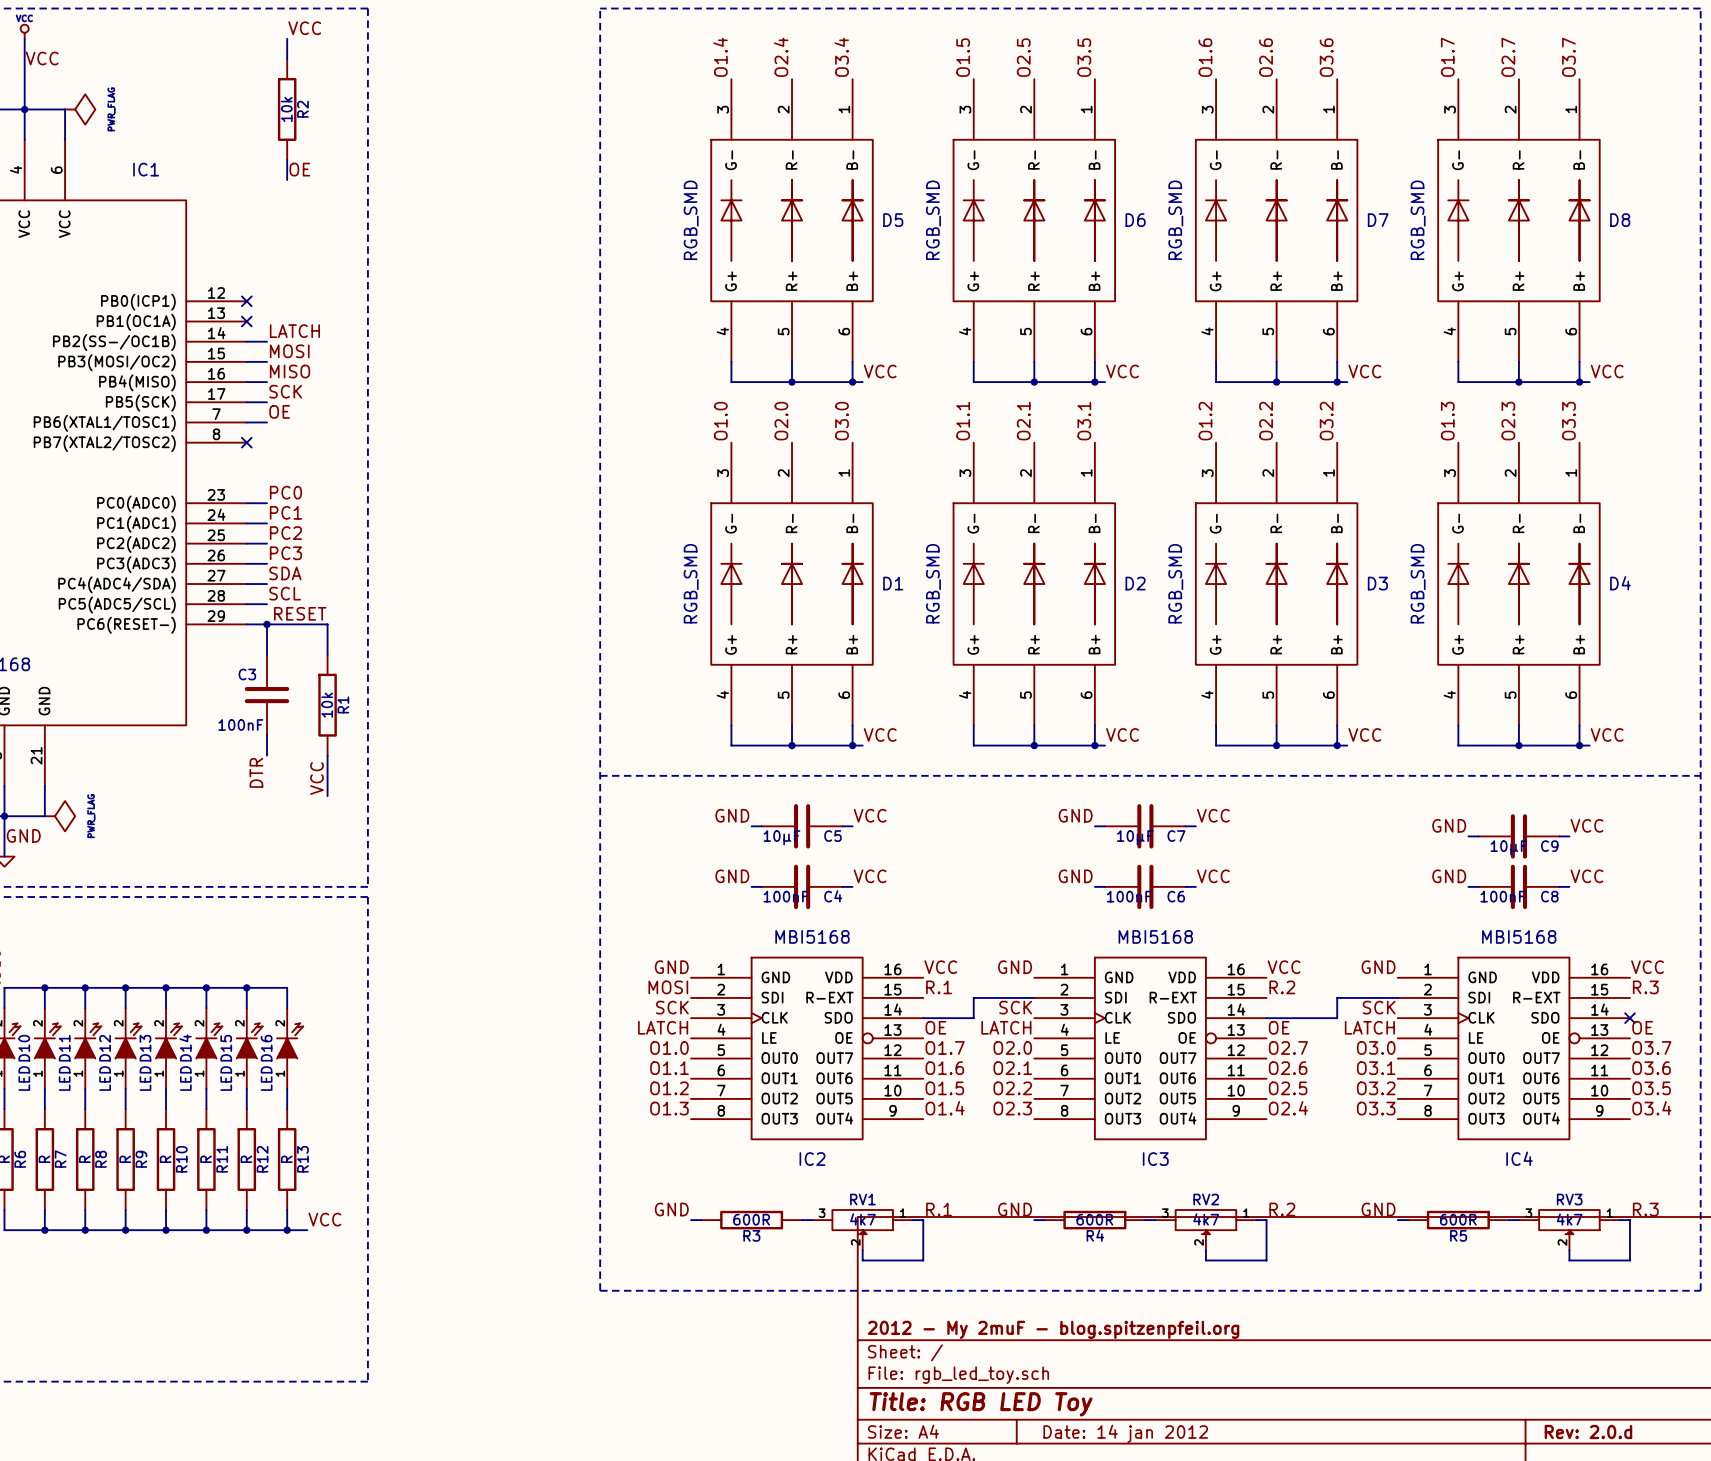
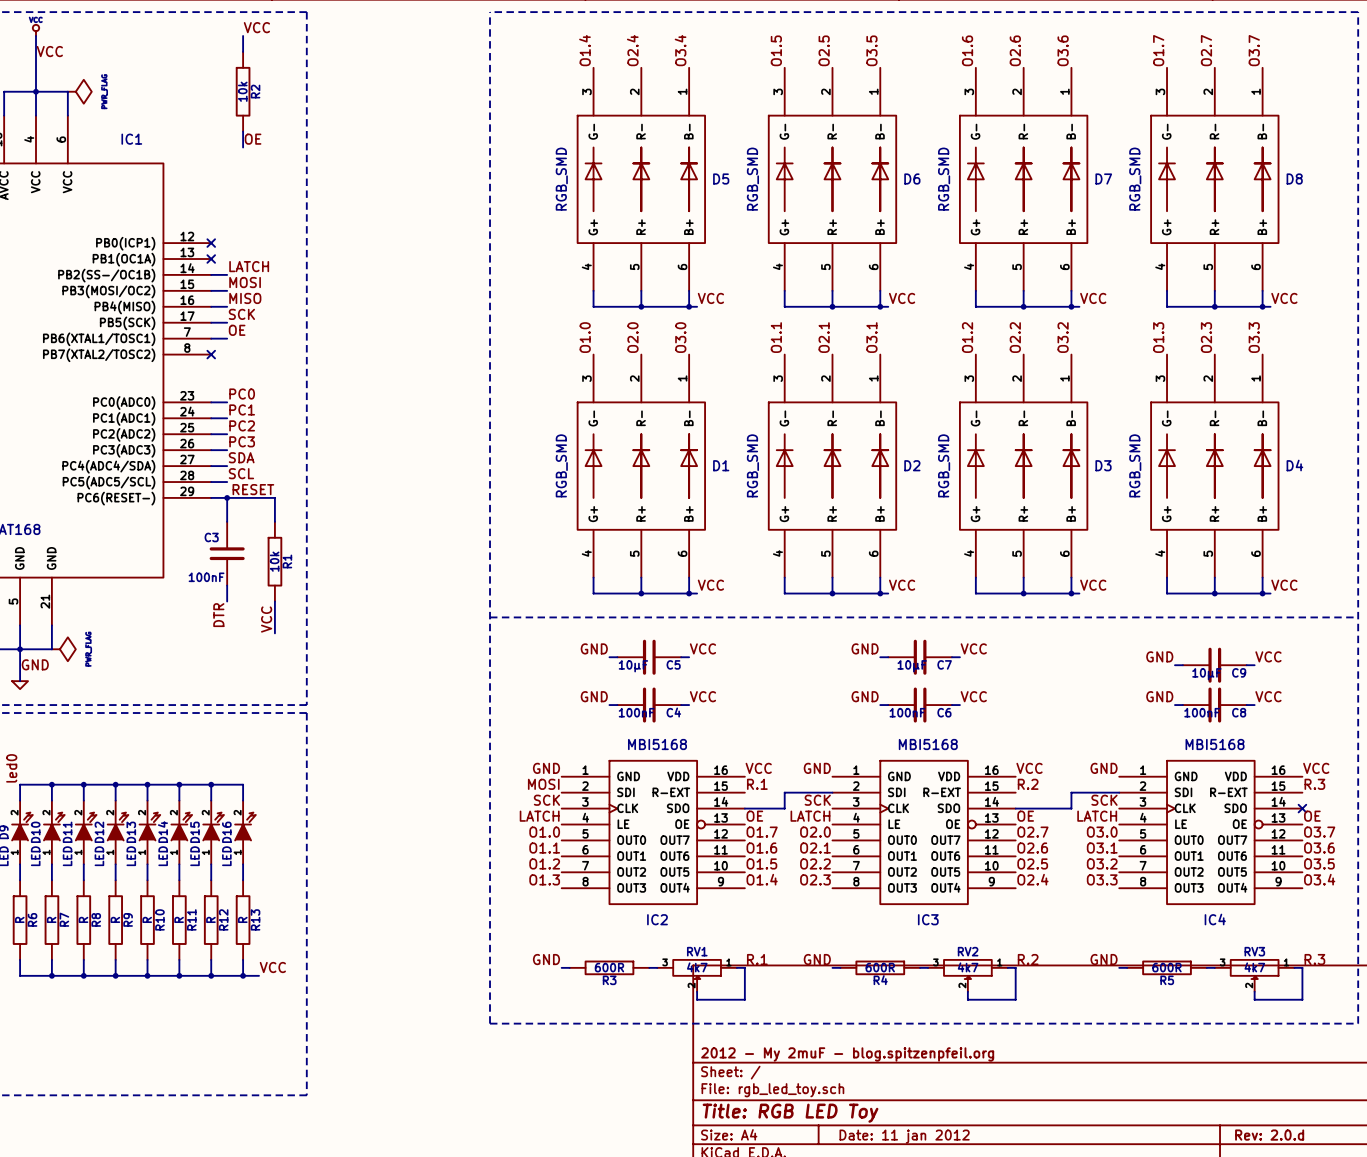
title block: Date: 14 jan 2012 (1125, 1433) -> Date: 11 jan 2012 (904, 1136)

